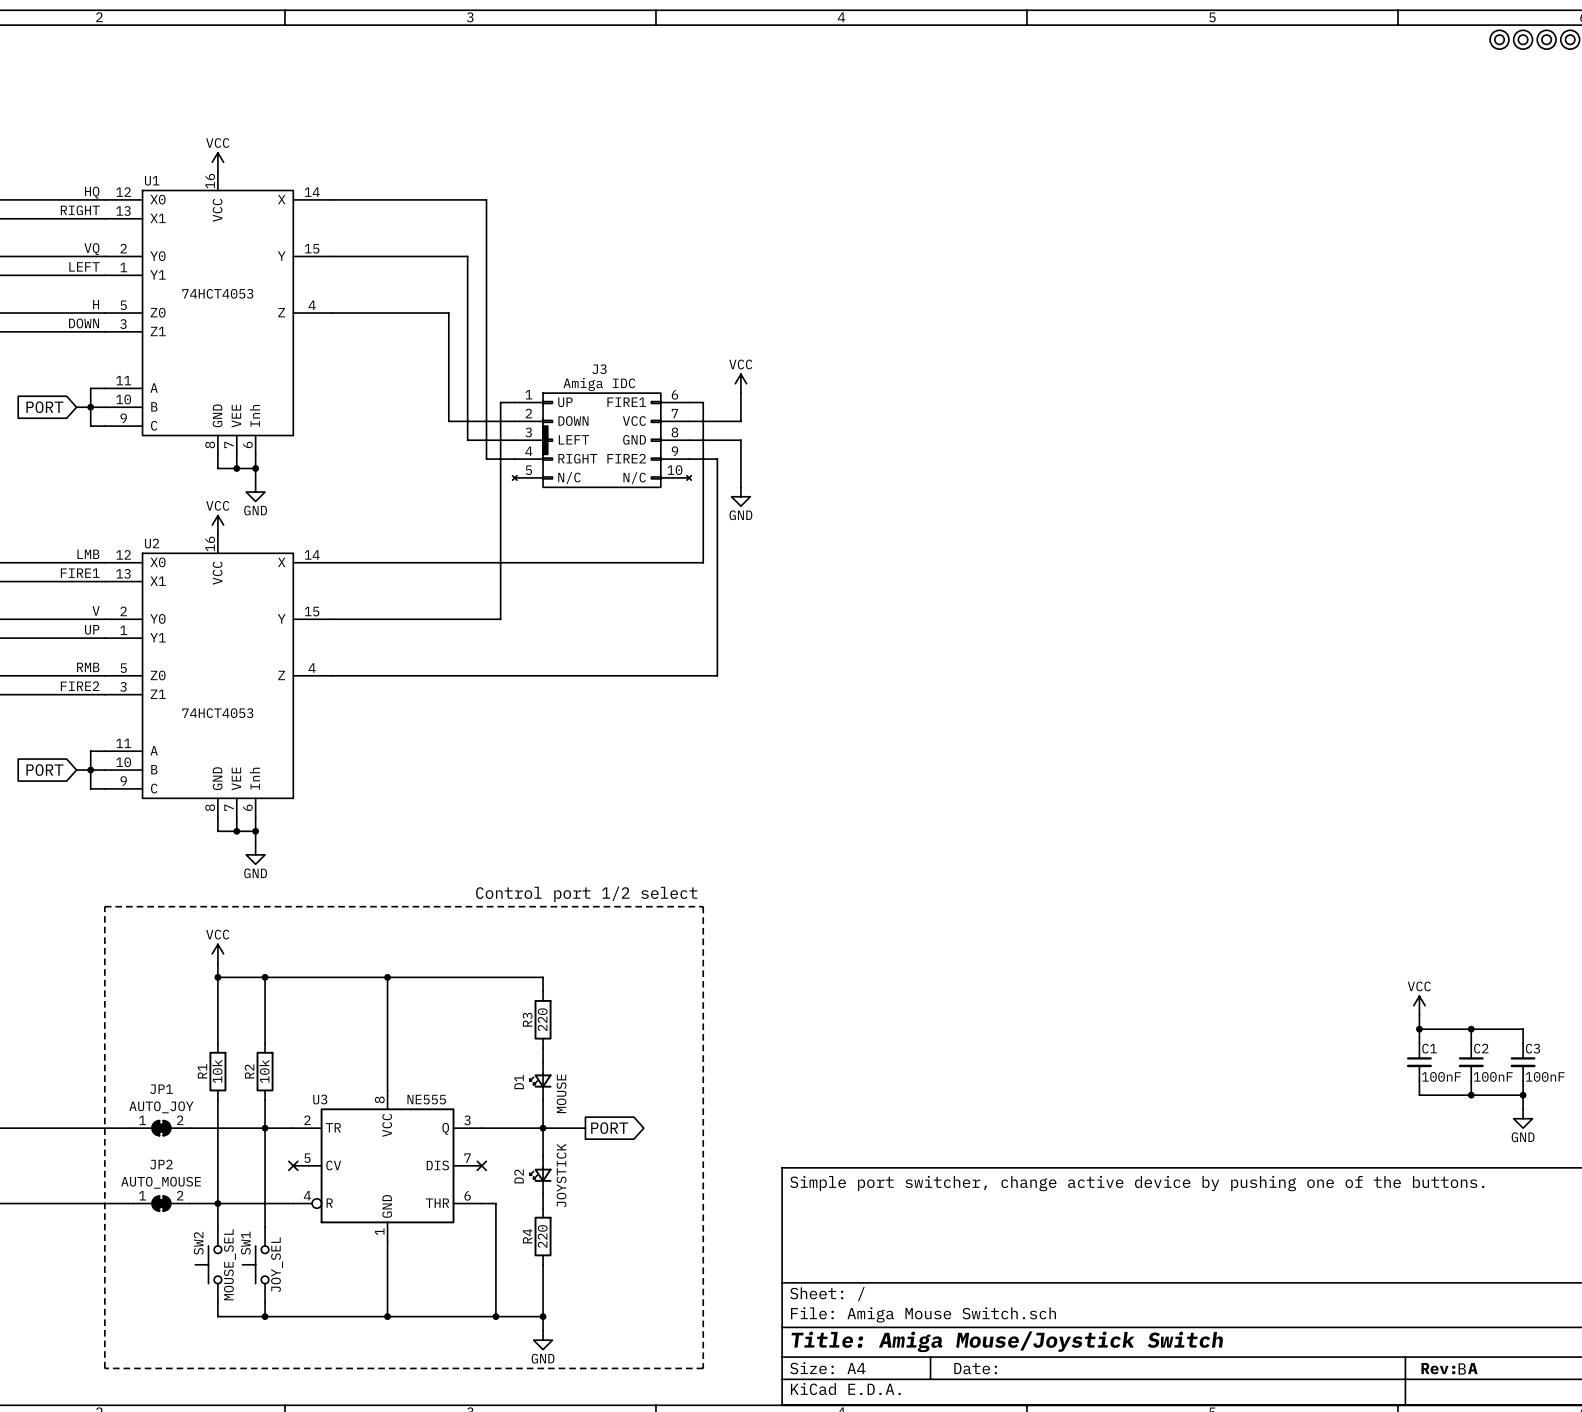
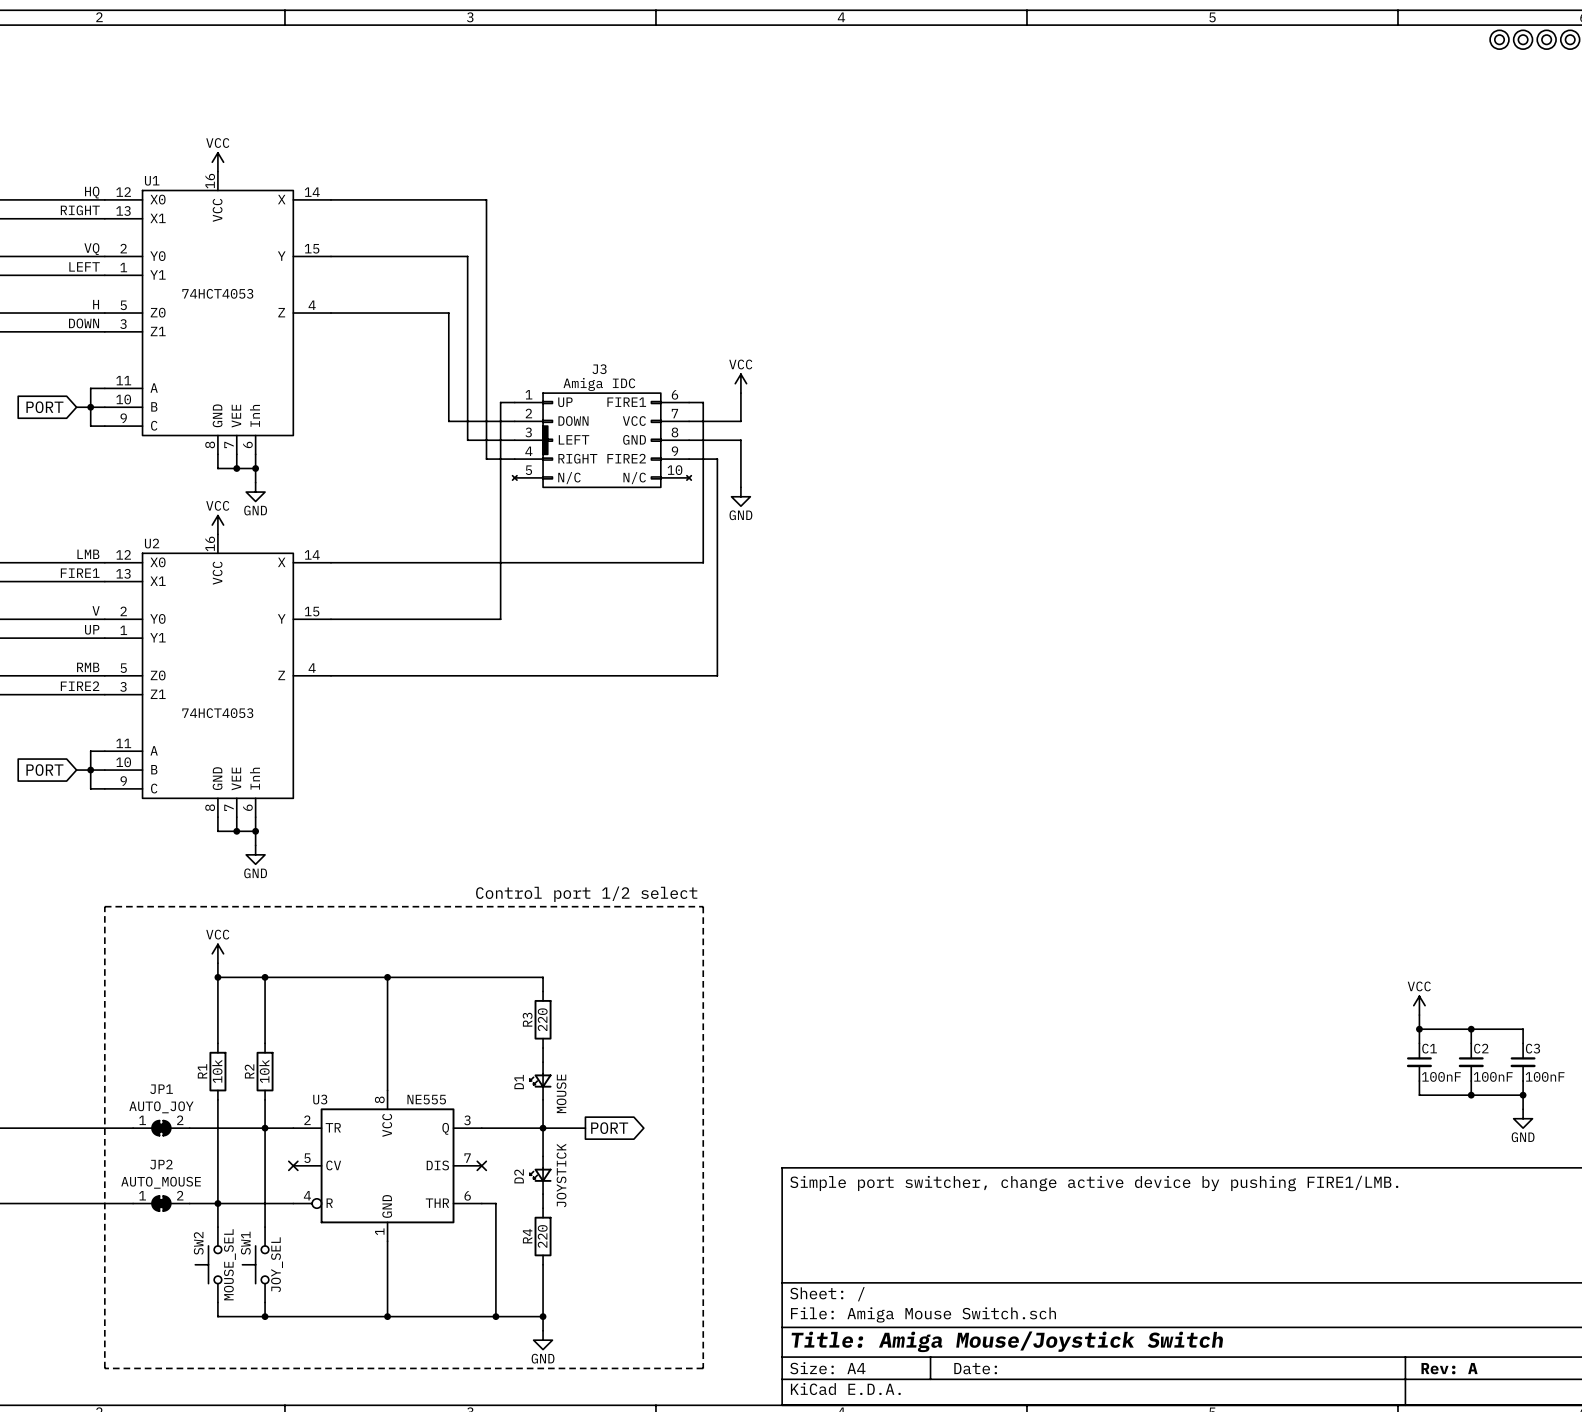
title block: Simple port switcher, change active device by pushing one of the buttons. (1137, 1183) -> Simple port switcher, change active device by pushing FIRE1/LMB. (1094, 1183)
text: B (1462, 1368) -> none

